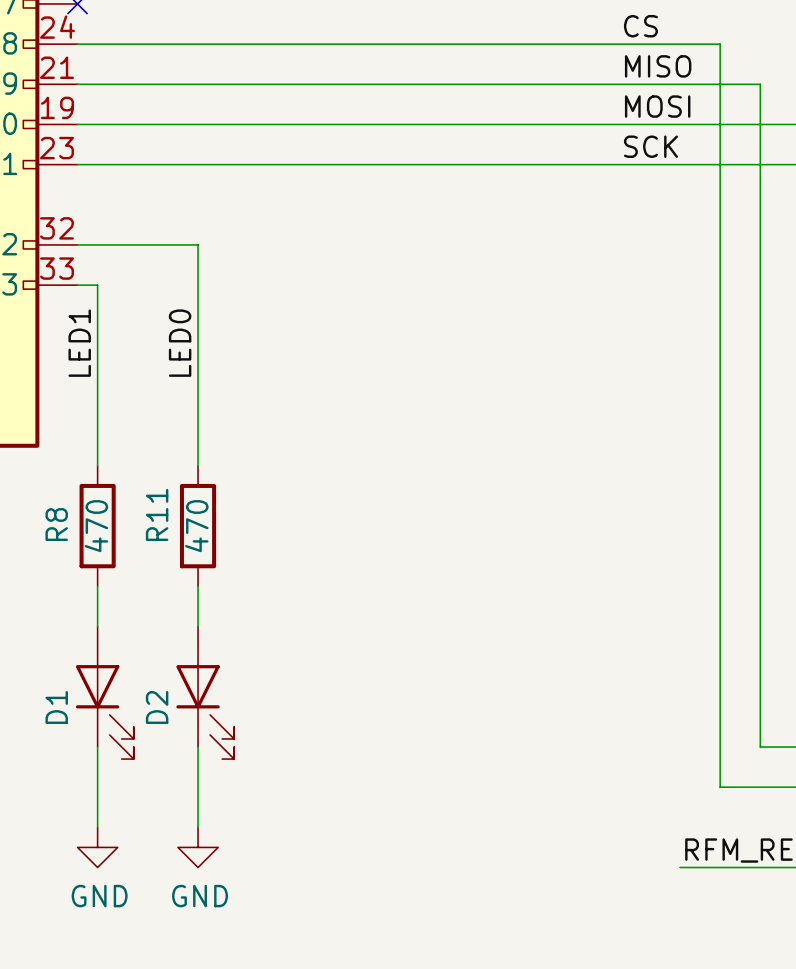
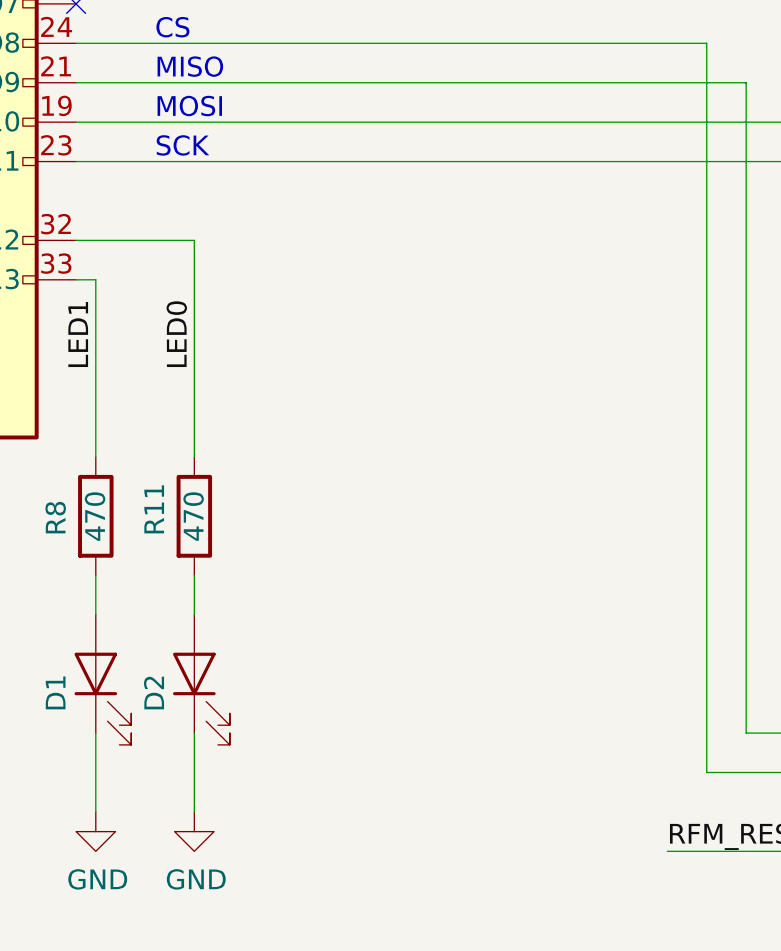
label: CS (640, 26) -> none
text: none -> CS (172, 27)
label: MISO (658, 66) -> none
text: none -> MISO (190, 66)
label: MOSI (657, 106) -> none
text: none -> MOSI (189, 106)
label: SCK (650, 146) -> none
text: none -> SCK (182, 145)

